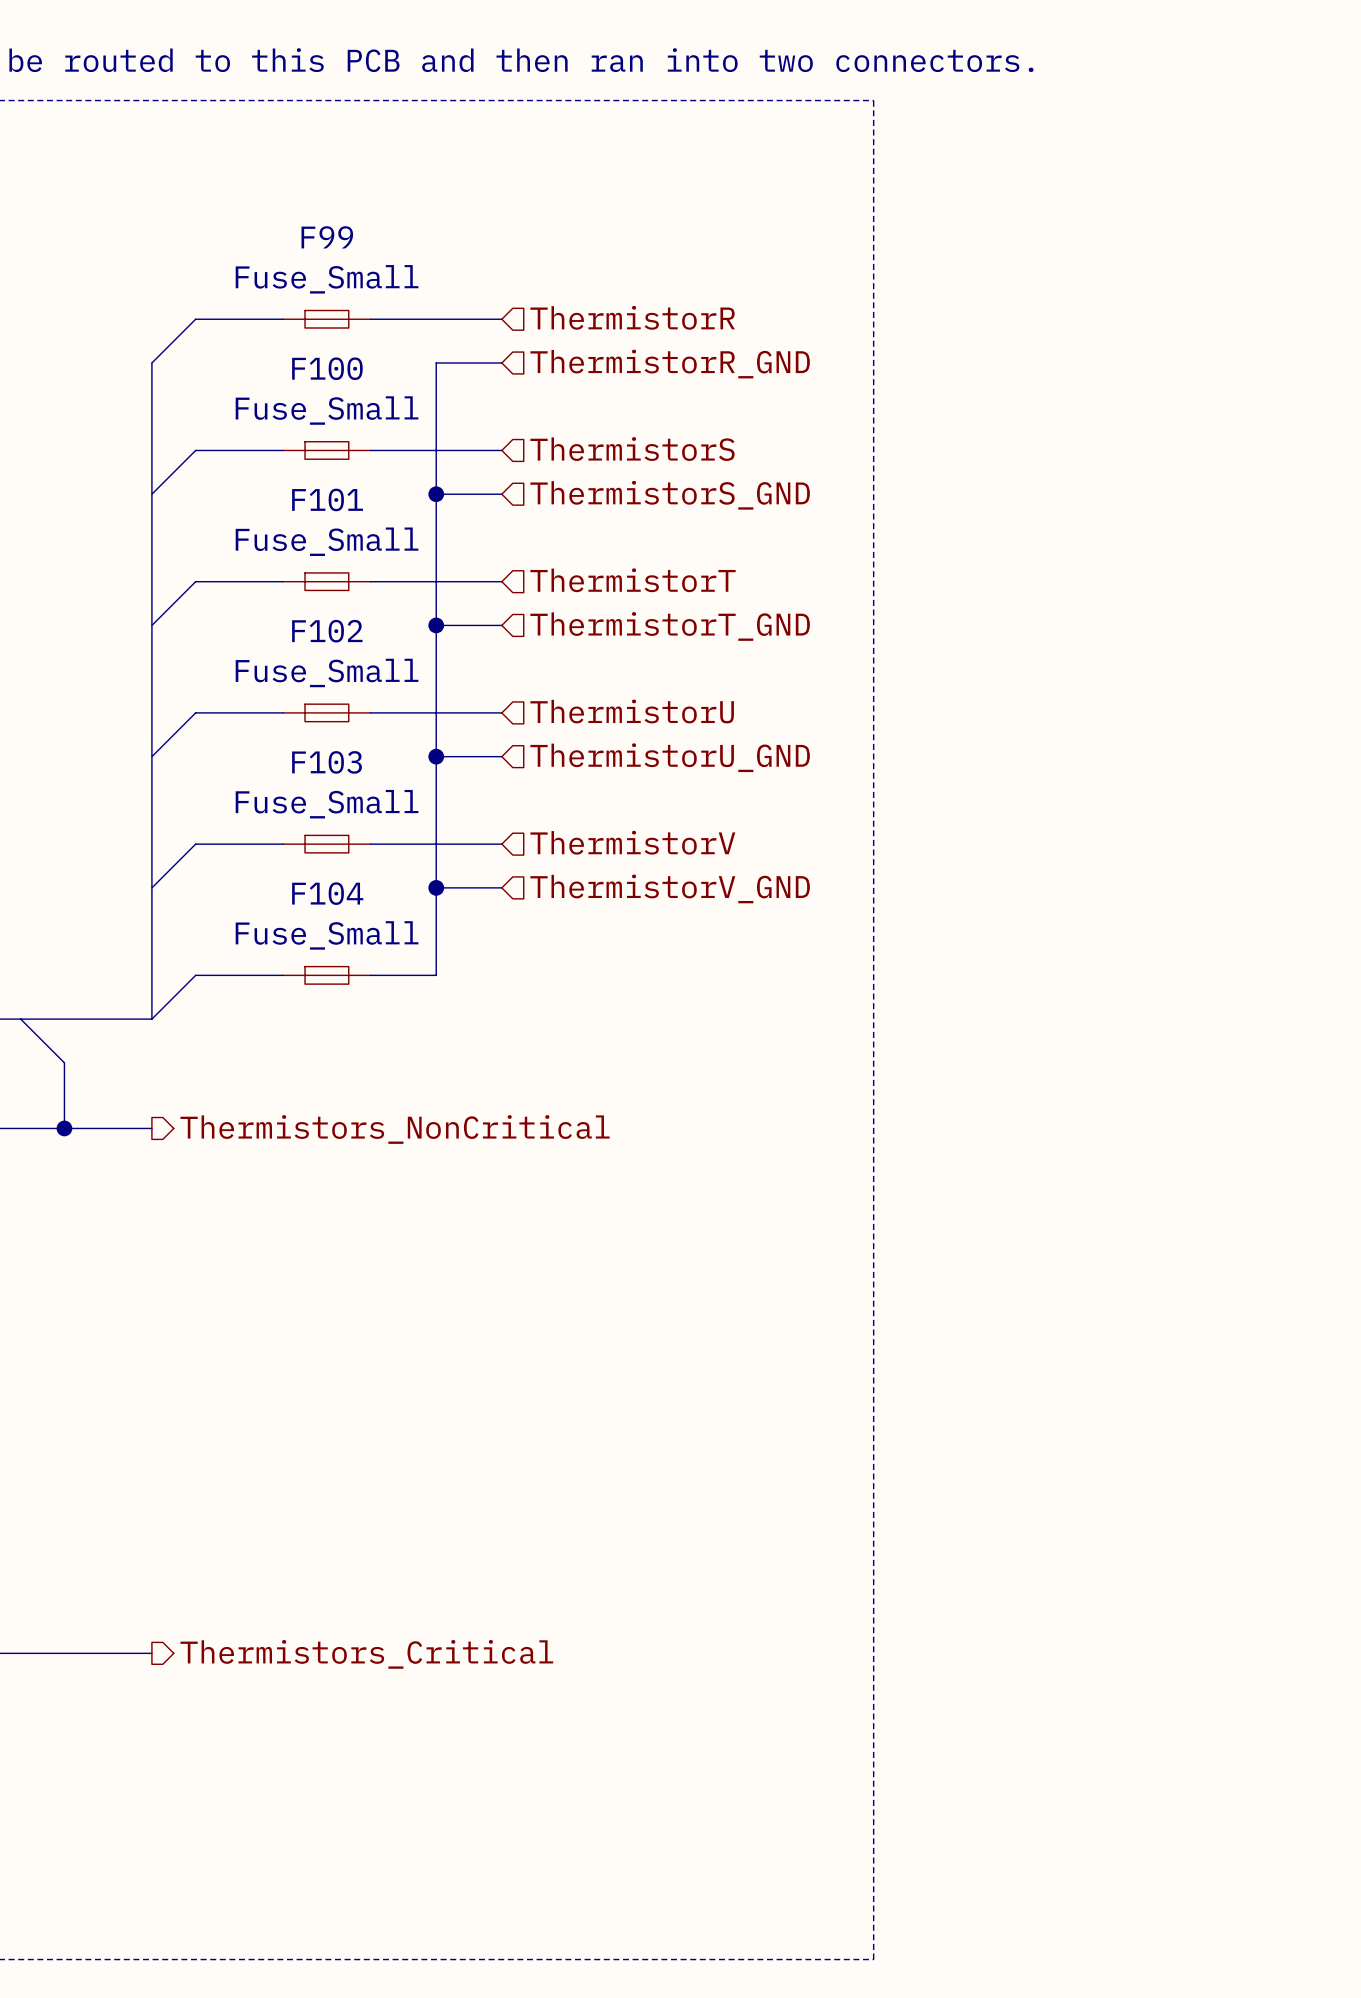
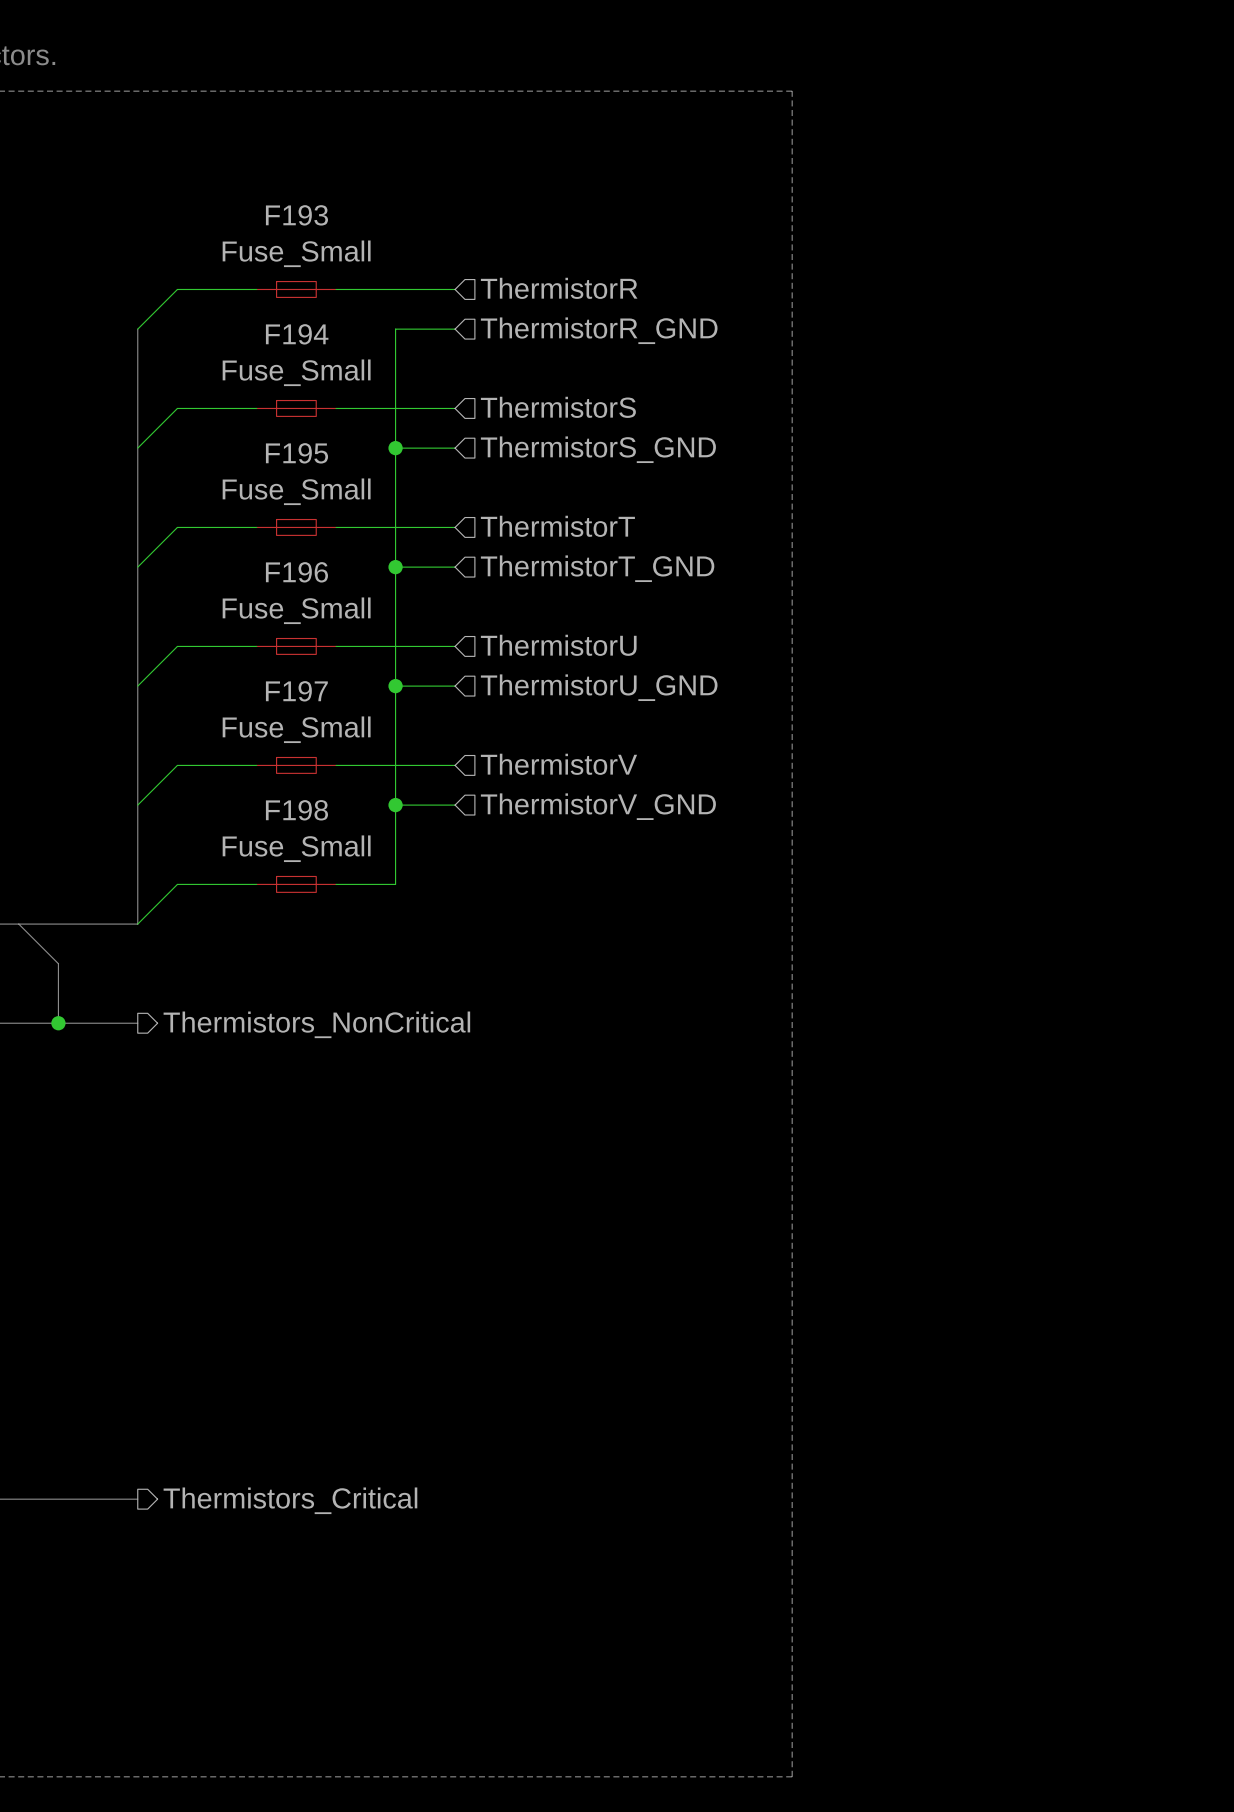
F99 name: F99 (327, 237) -> F193 (296, 215)
F100 name: F100 (327, 368) -> F194 (297, 334)
F101 name: F101 (327, 499) -> F195 (296, 453)
F102 name: F102 (327, 631) -> F196 (296, 572)
F103 name: F103 (327, 762) -> F197 (296, 691)
F104 name: F104 (327, 893) -> F198 (296, 810)

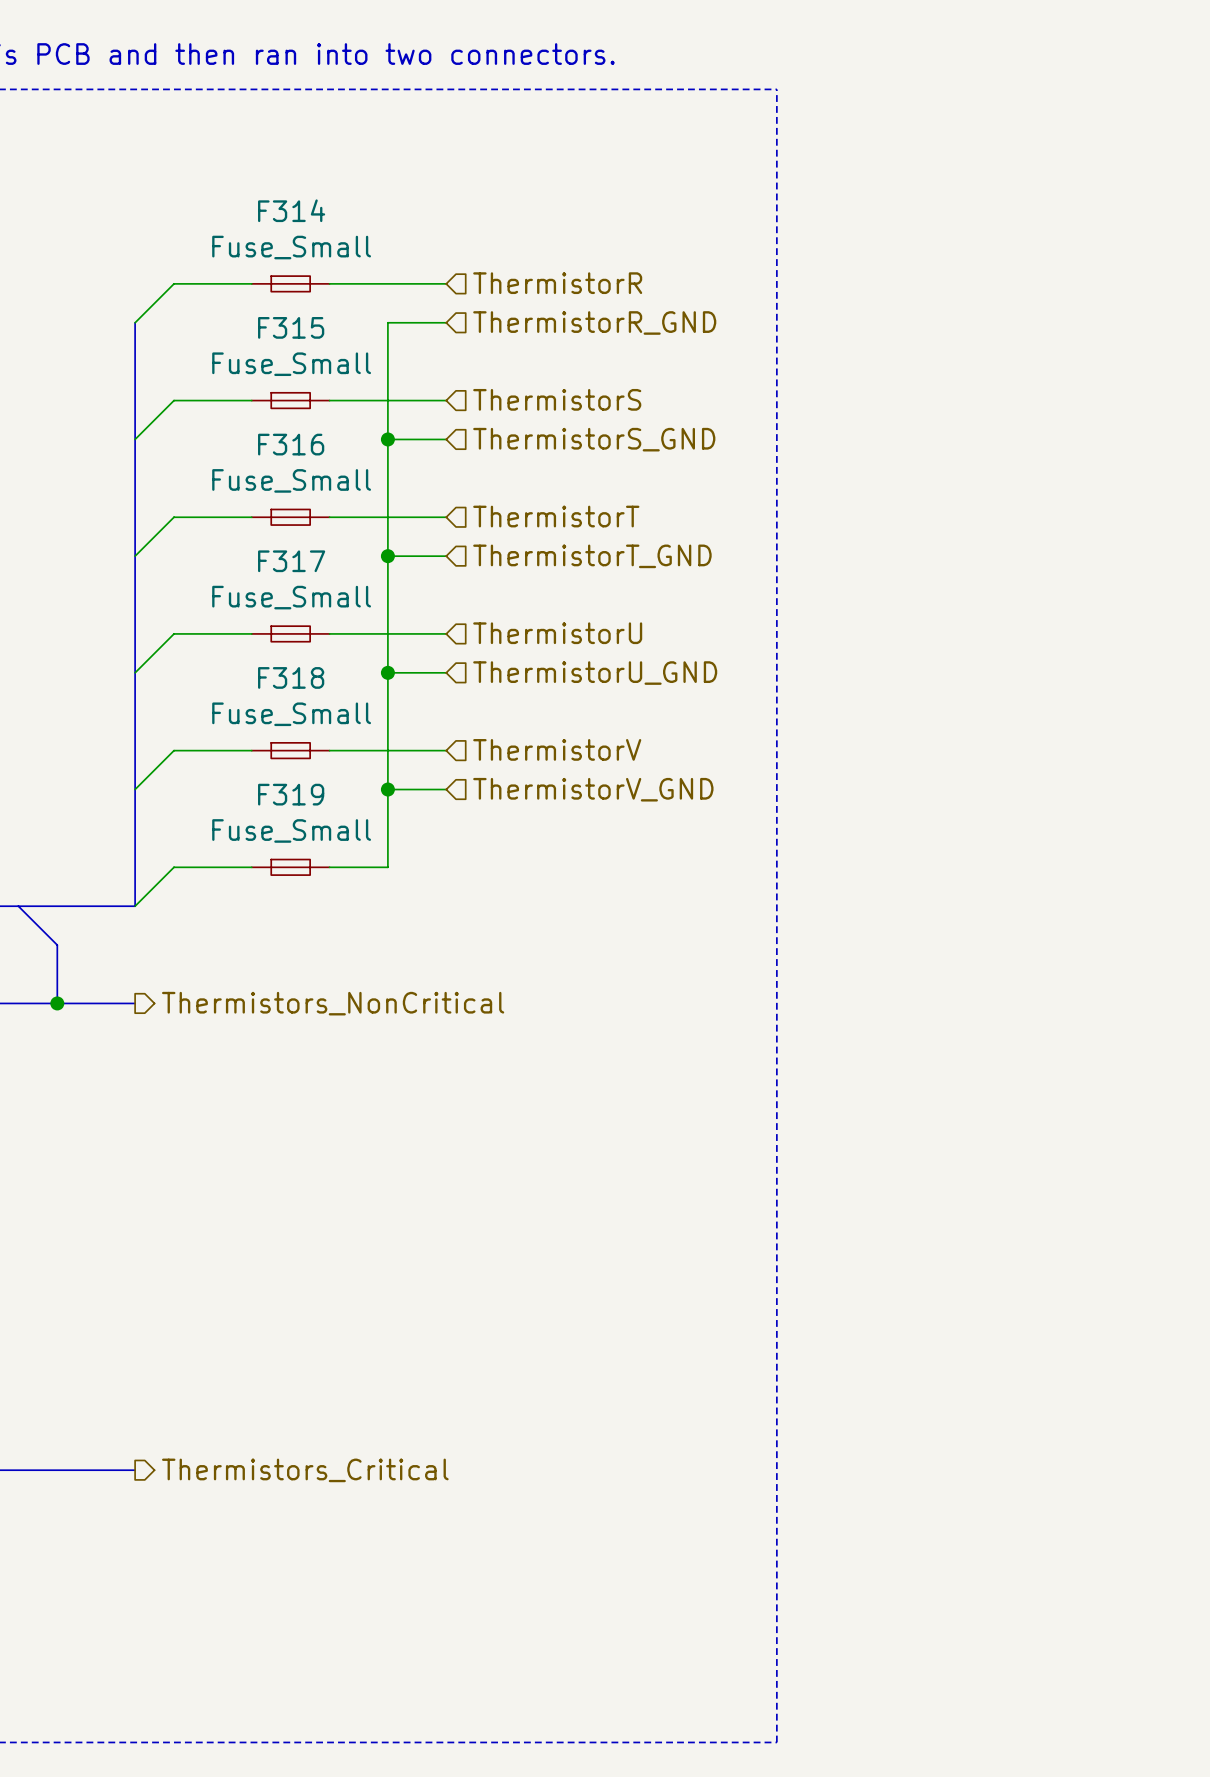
F193 name: F193 (296, 215) -> F314 (291, 210)
F194 name: F194 (297, 334) -> F315 (291, 327)
F195 name: F195 (296, 453) -> F316 (291, 444)
F196 name: F196 (296, 572) -> F317 (291, 561)
F197 name: F197 (296, 691) -> F318 (291, 677)
F198 name: F198 (296, 810) -> F319 (291, 794)

